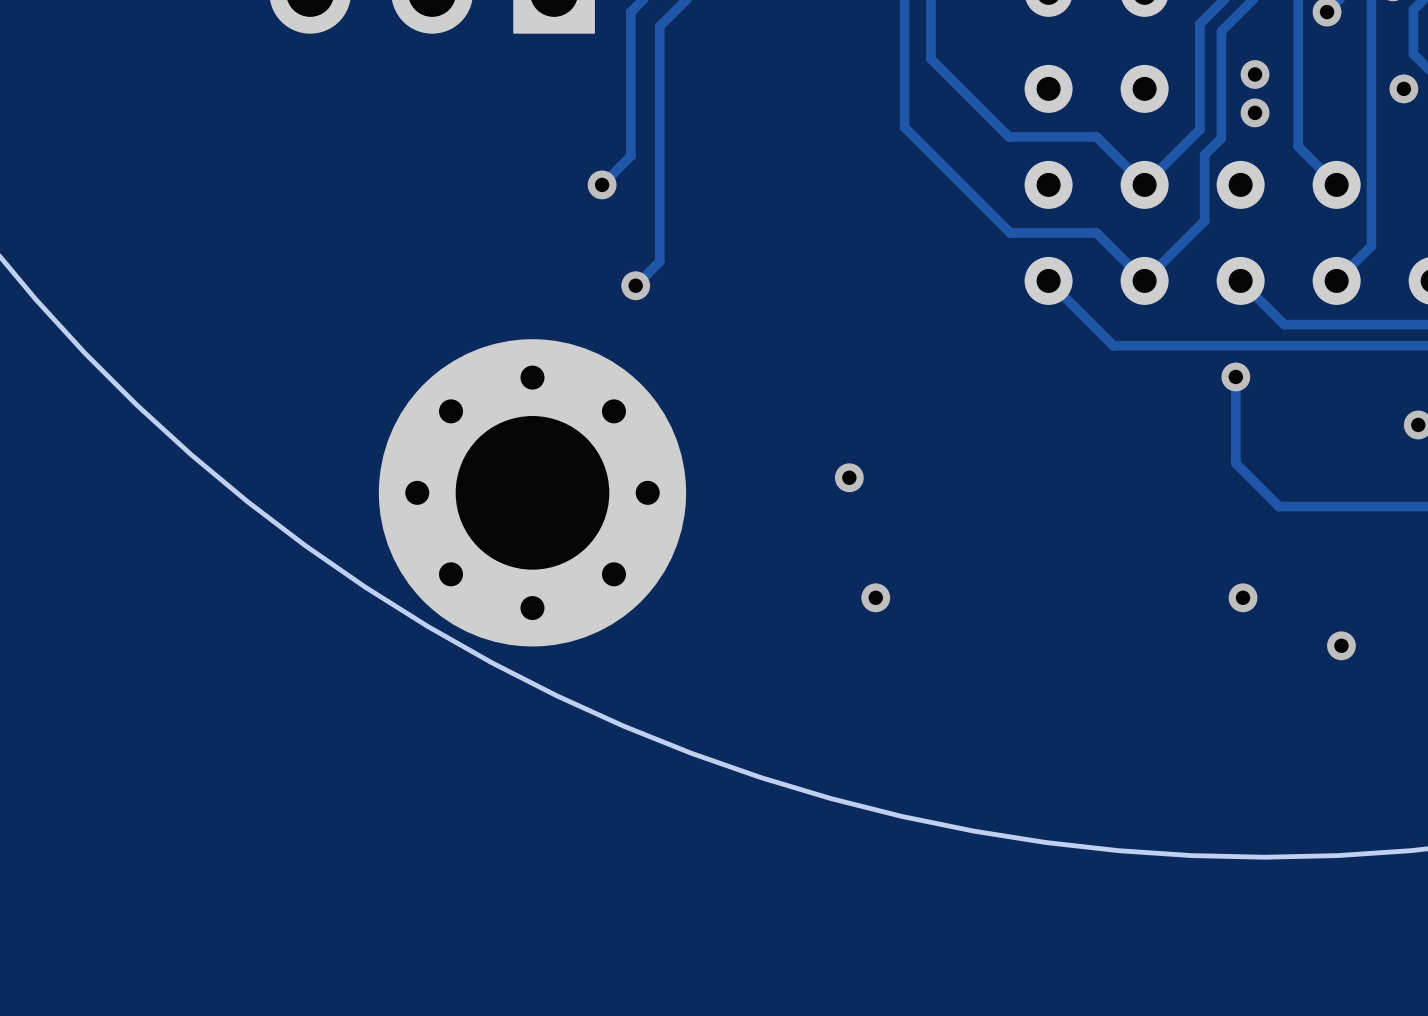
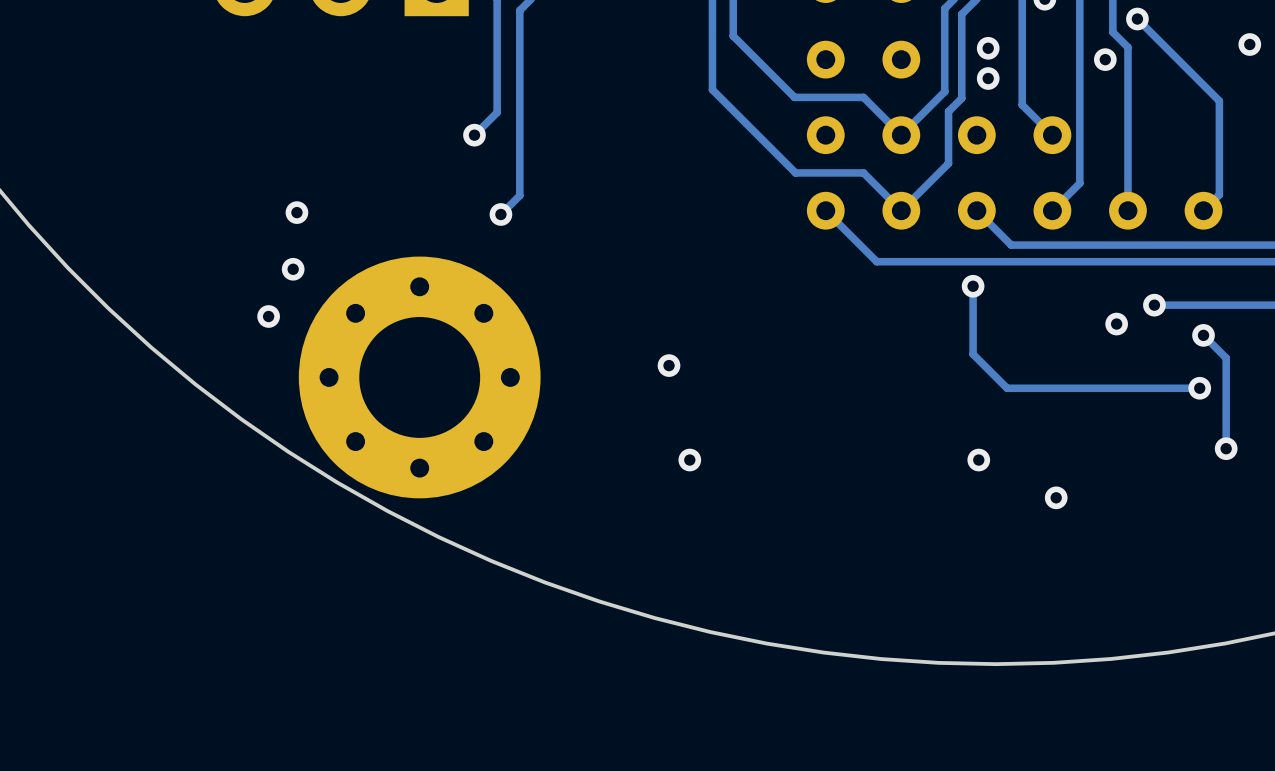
via: none -> (296, 212)
via: none -> (293, 269)
via: none -> (268, 316)

